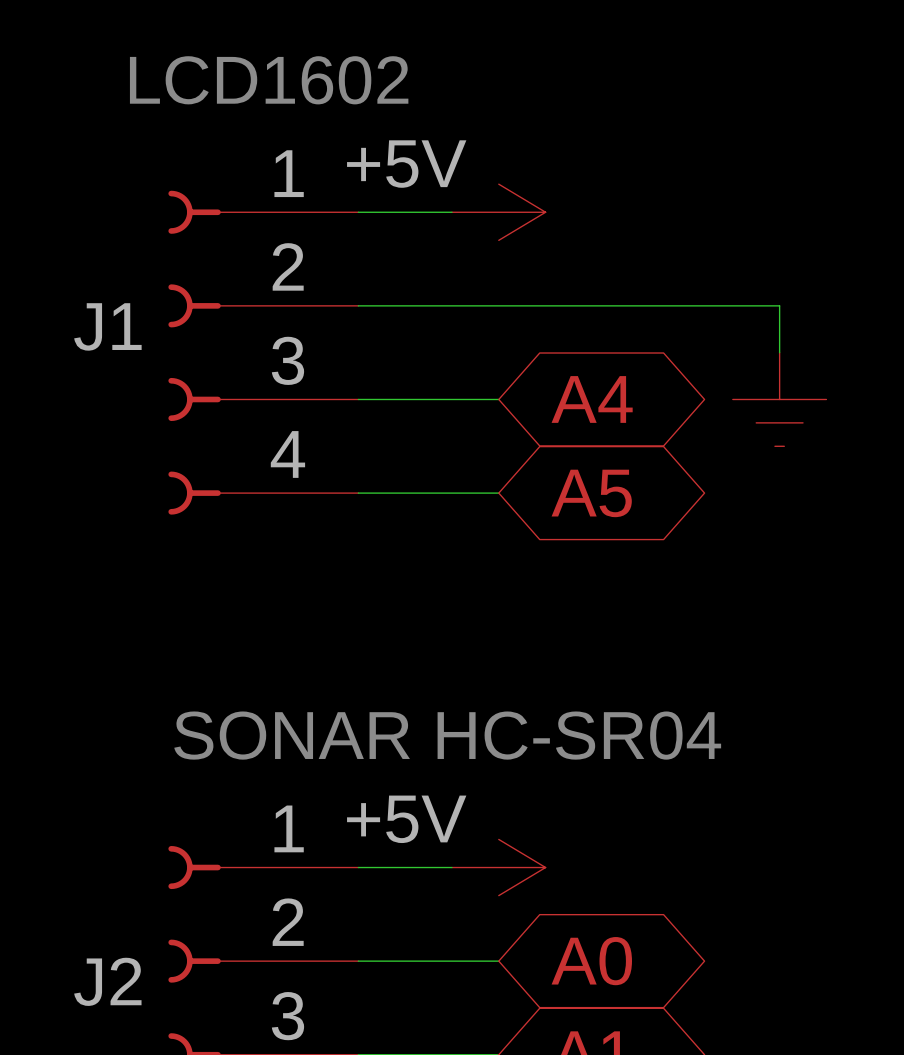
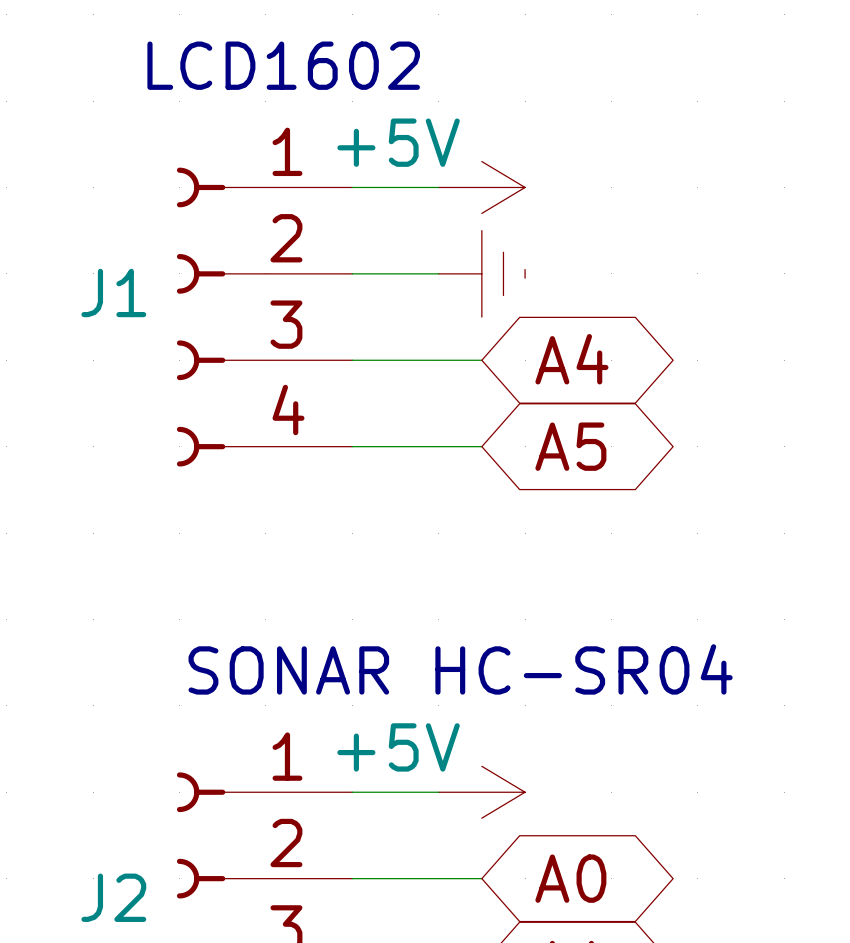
wire: (451, 305) (779, 305) (779, 352) -> none
power symbol rotation: 0° (779, 399) -> 90° counterclockwise (481, 273)
power symbol position: (779, 399) -> (481, 273)

